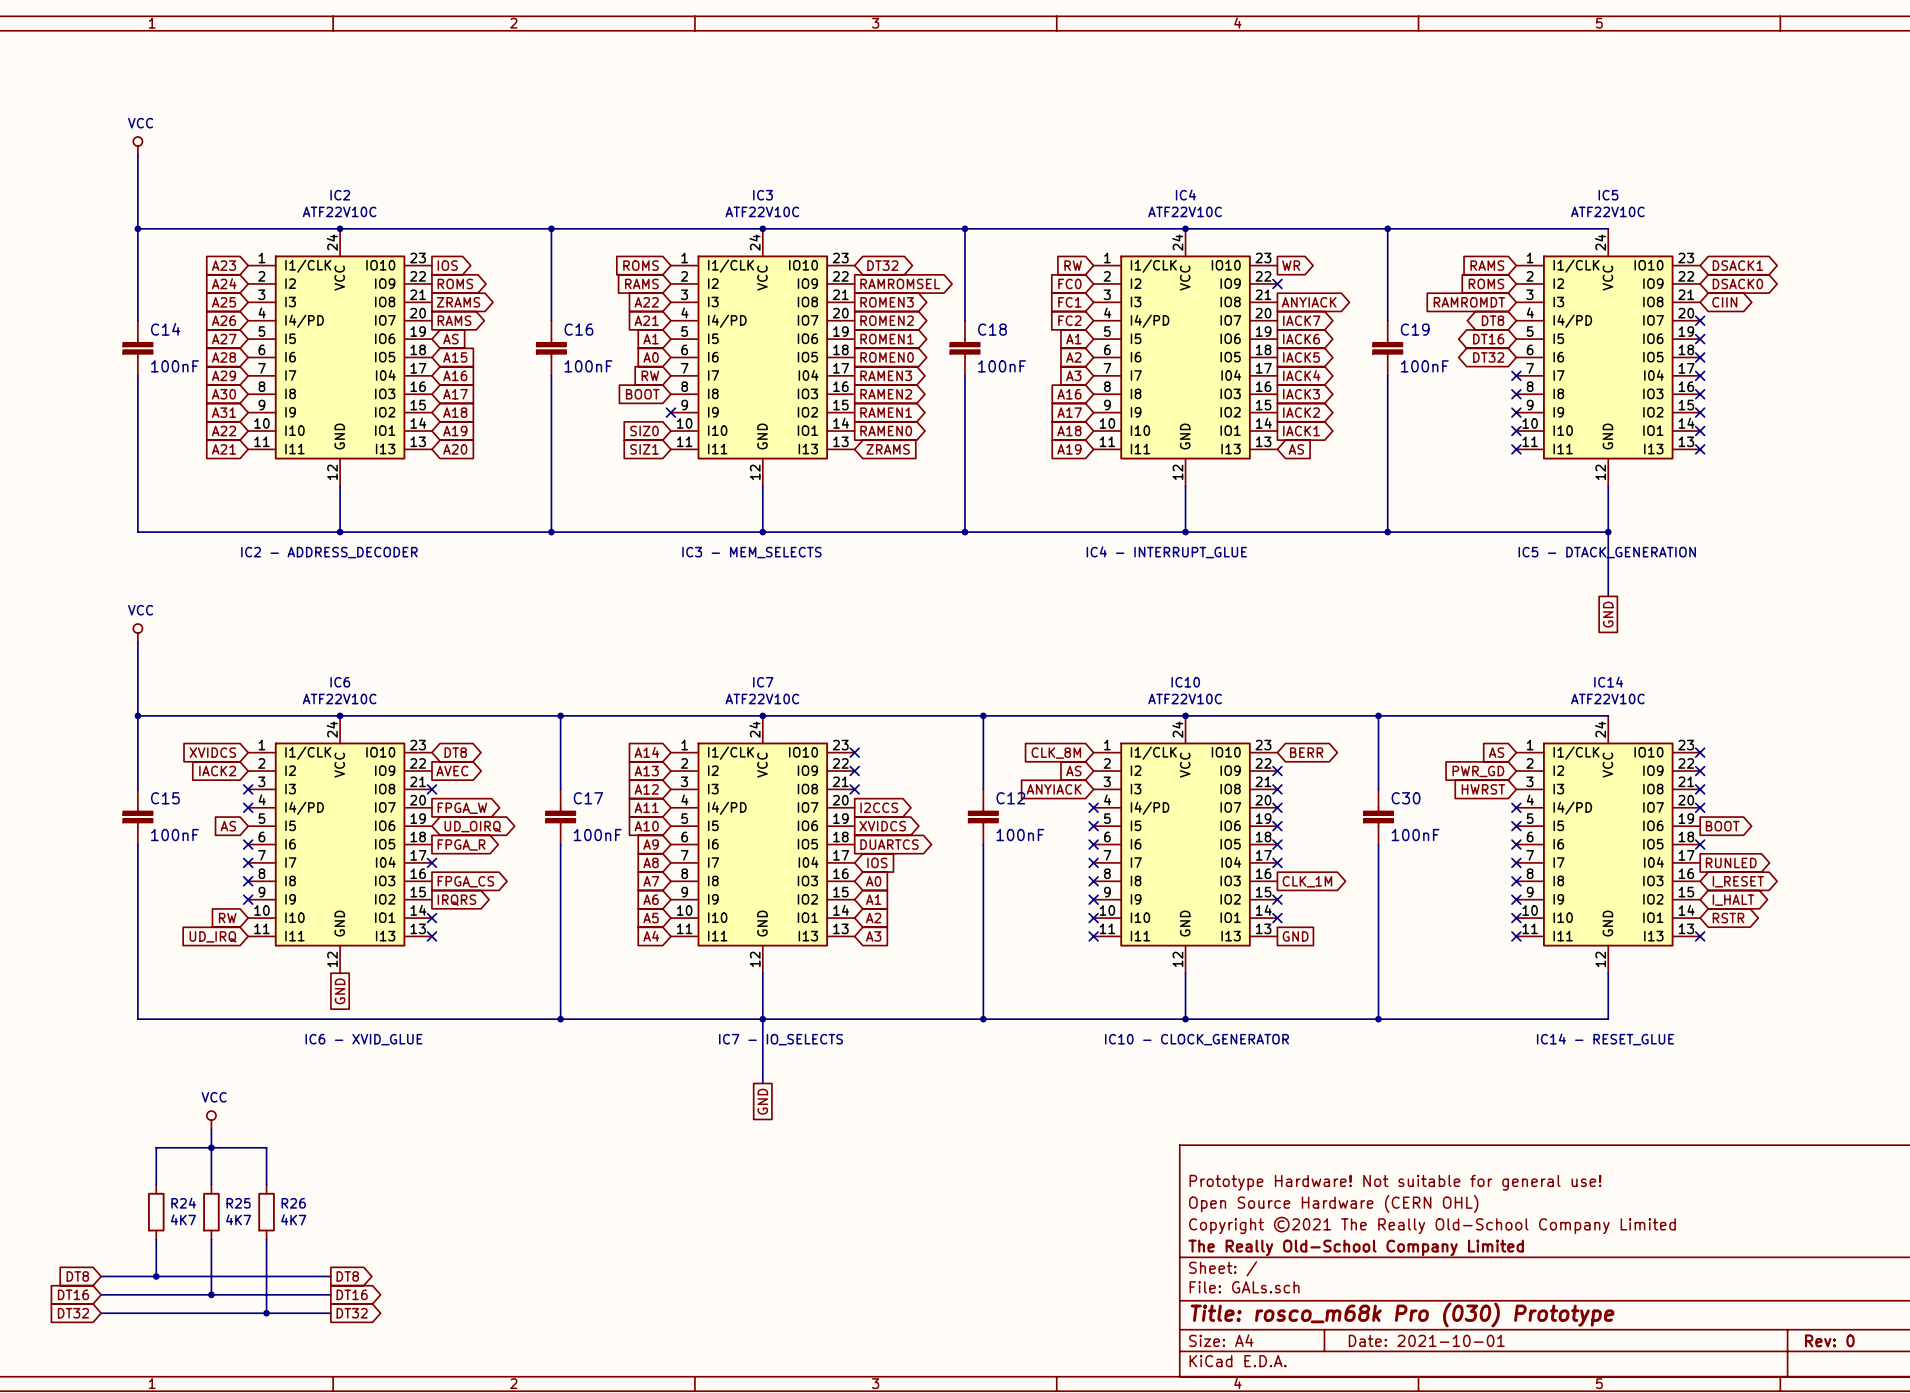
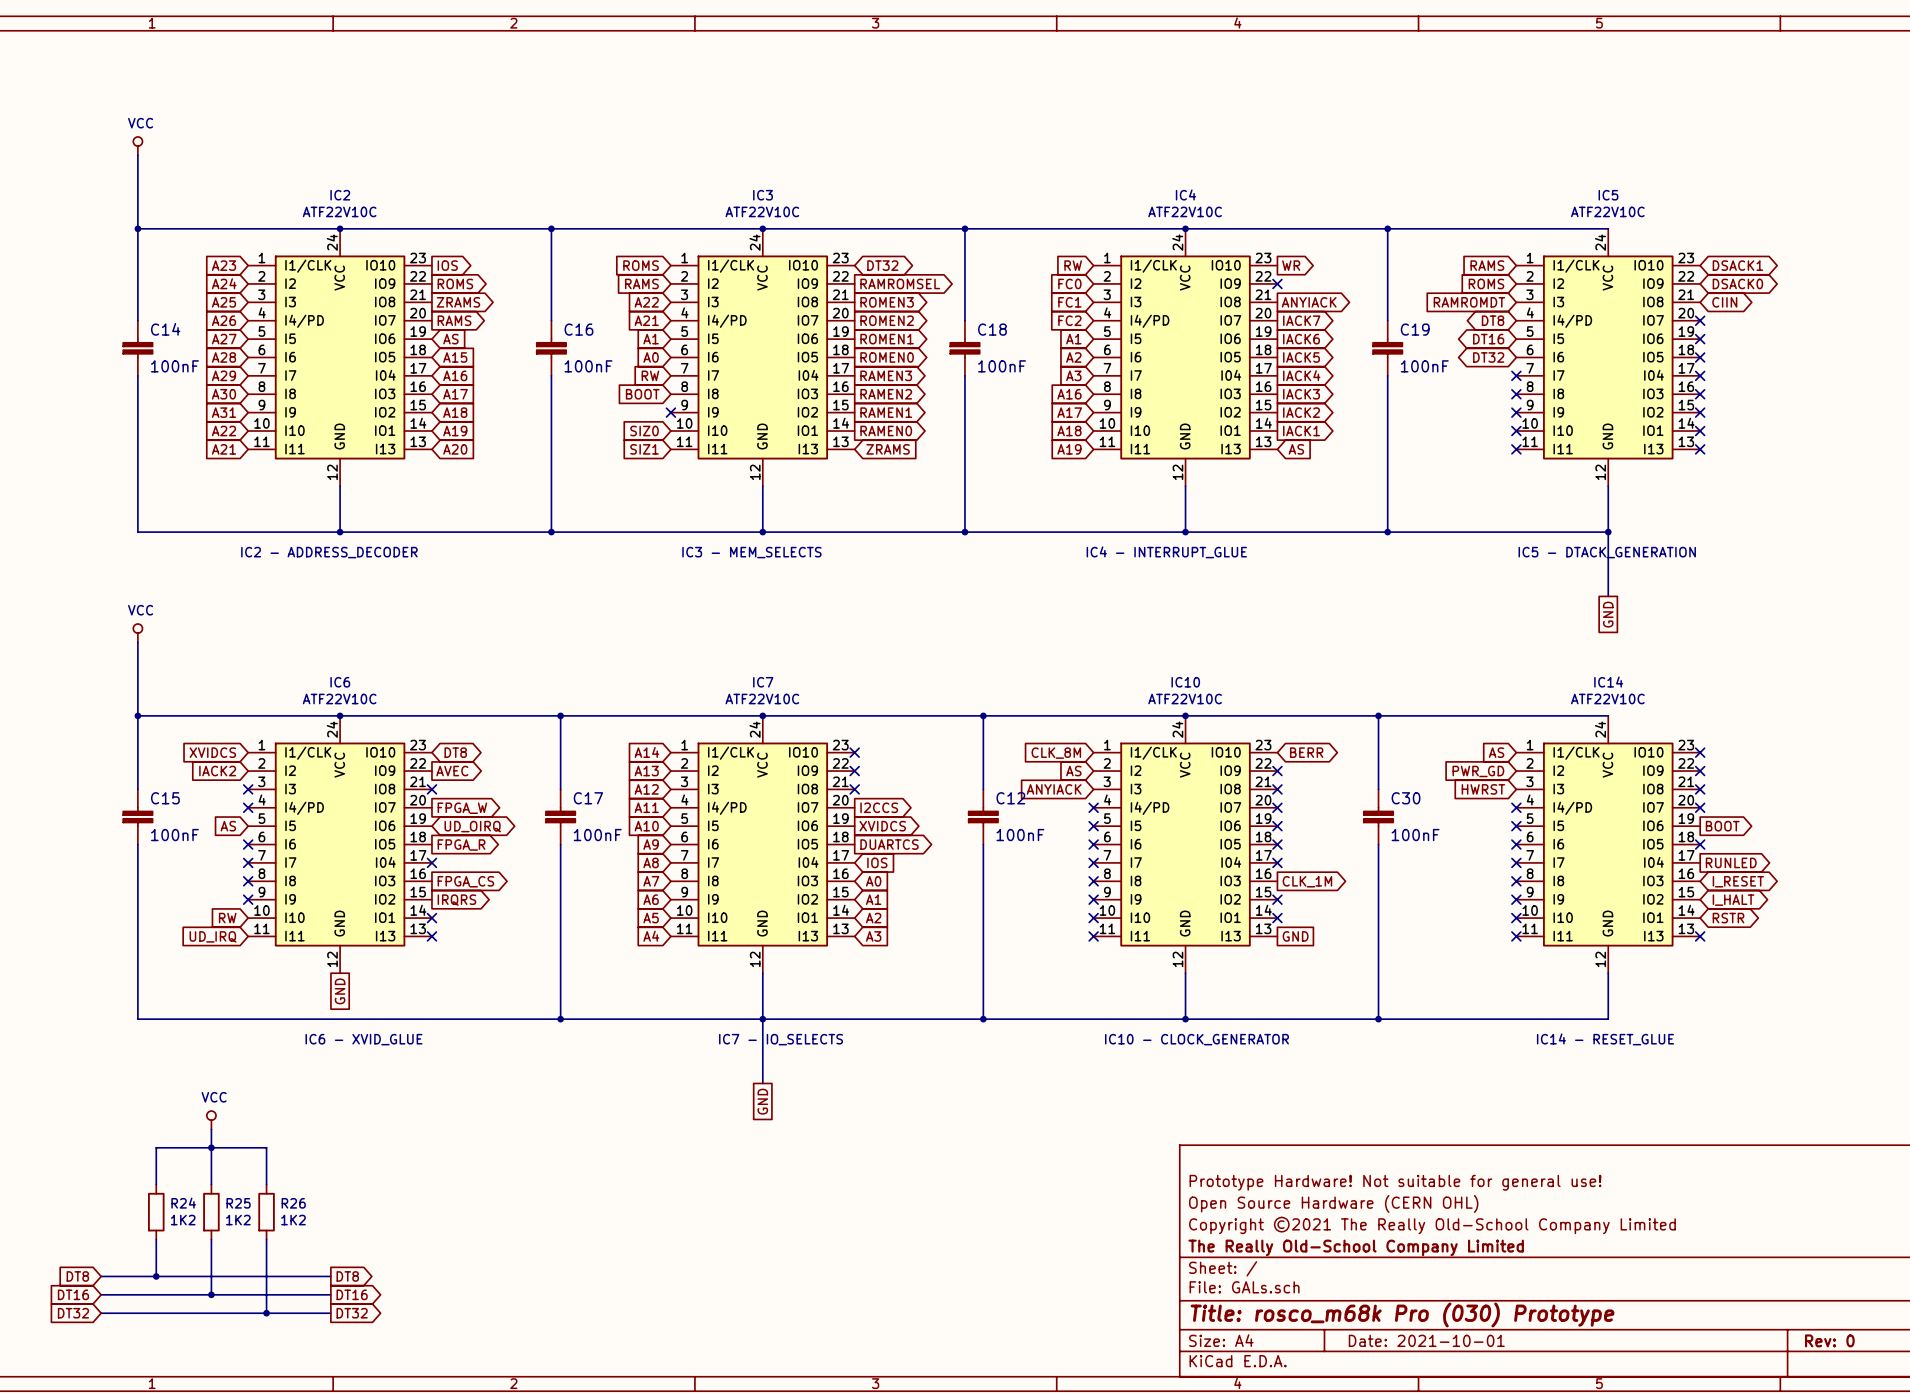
R24 value: 4K7 (183, 1219) -> 1K2 (183, 1220)
R25 value: 4K7 (238, 1219) -> 1K2 (238, 1220)
R26 value: 4K7 (293, 1219) -> 1K2 (293, 1220)

